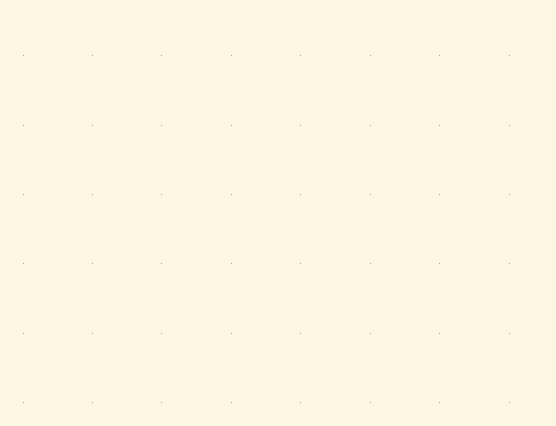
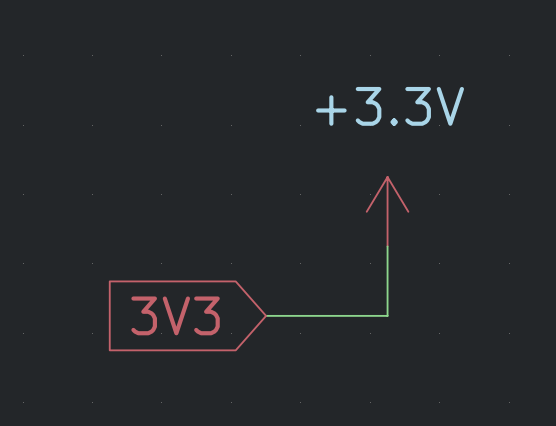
power symbol: none -> +3.3V (387, 211)
wire: none -> (387, 246) (387, 315) (266, 315)
global label: none -> 3V3 (175, 315)

